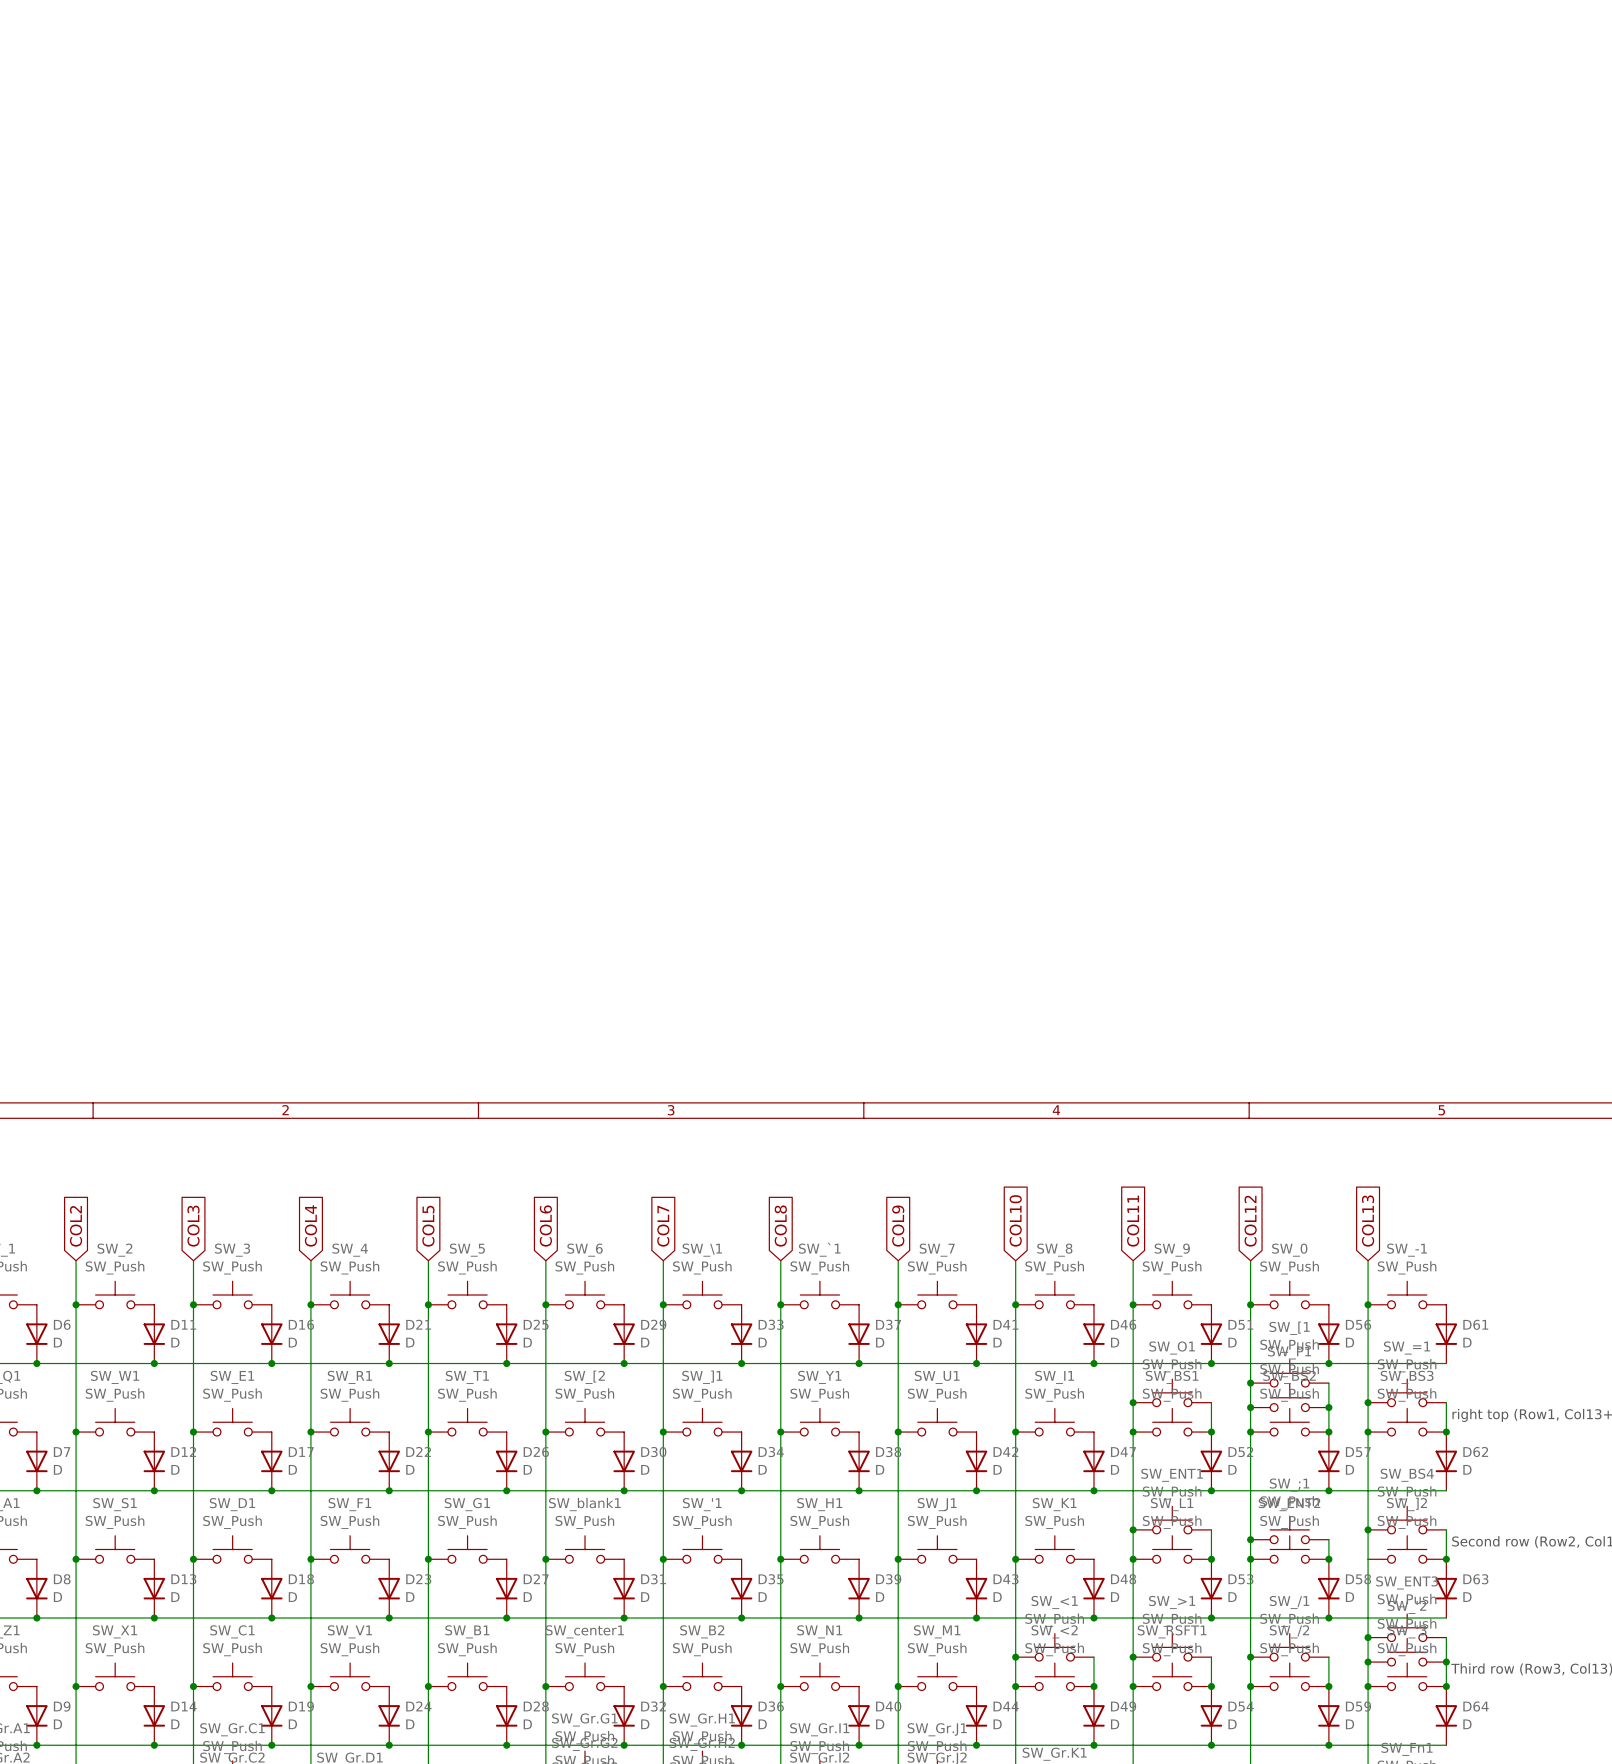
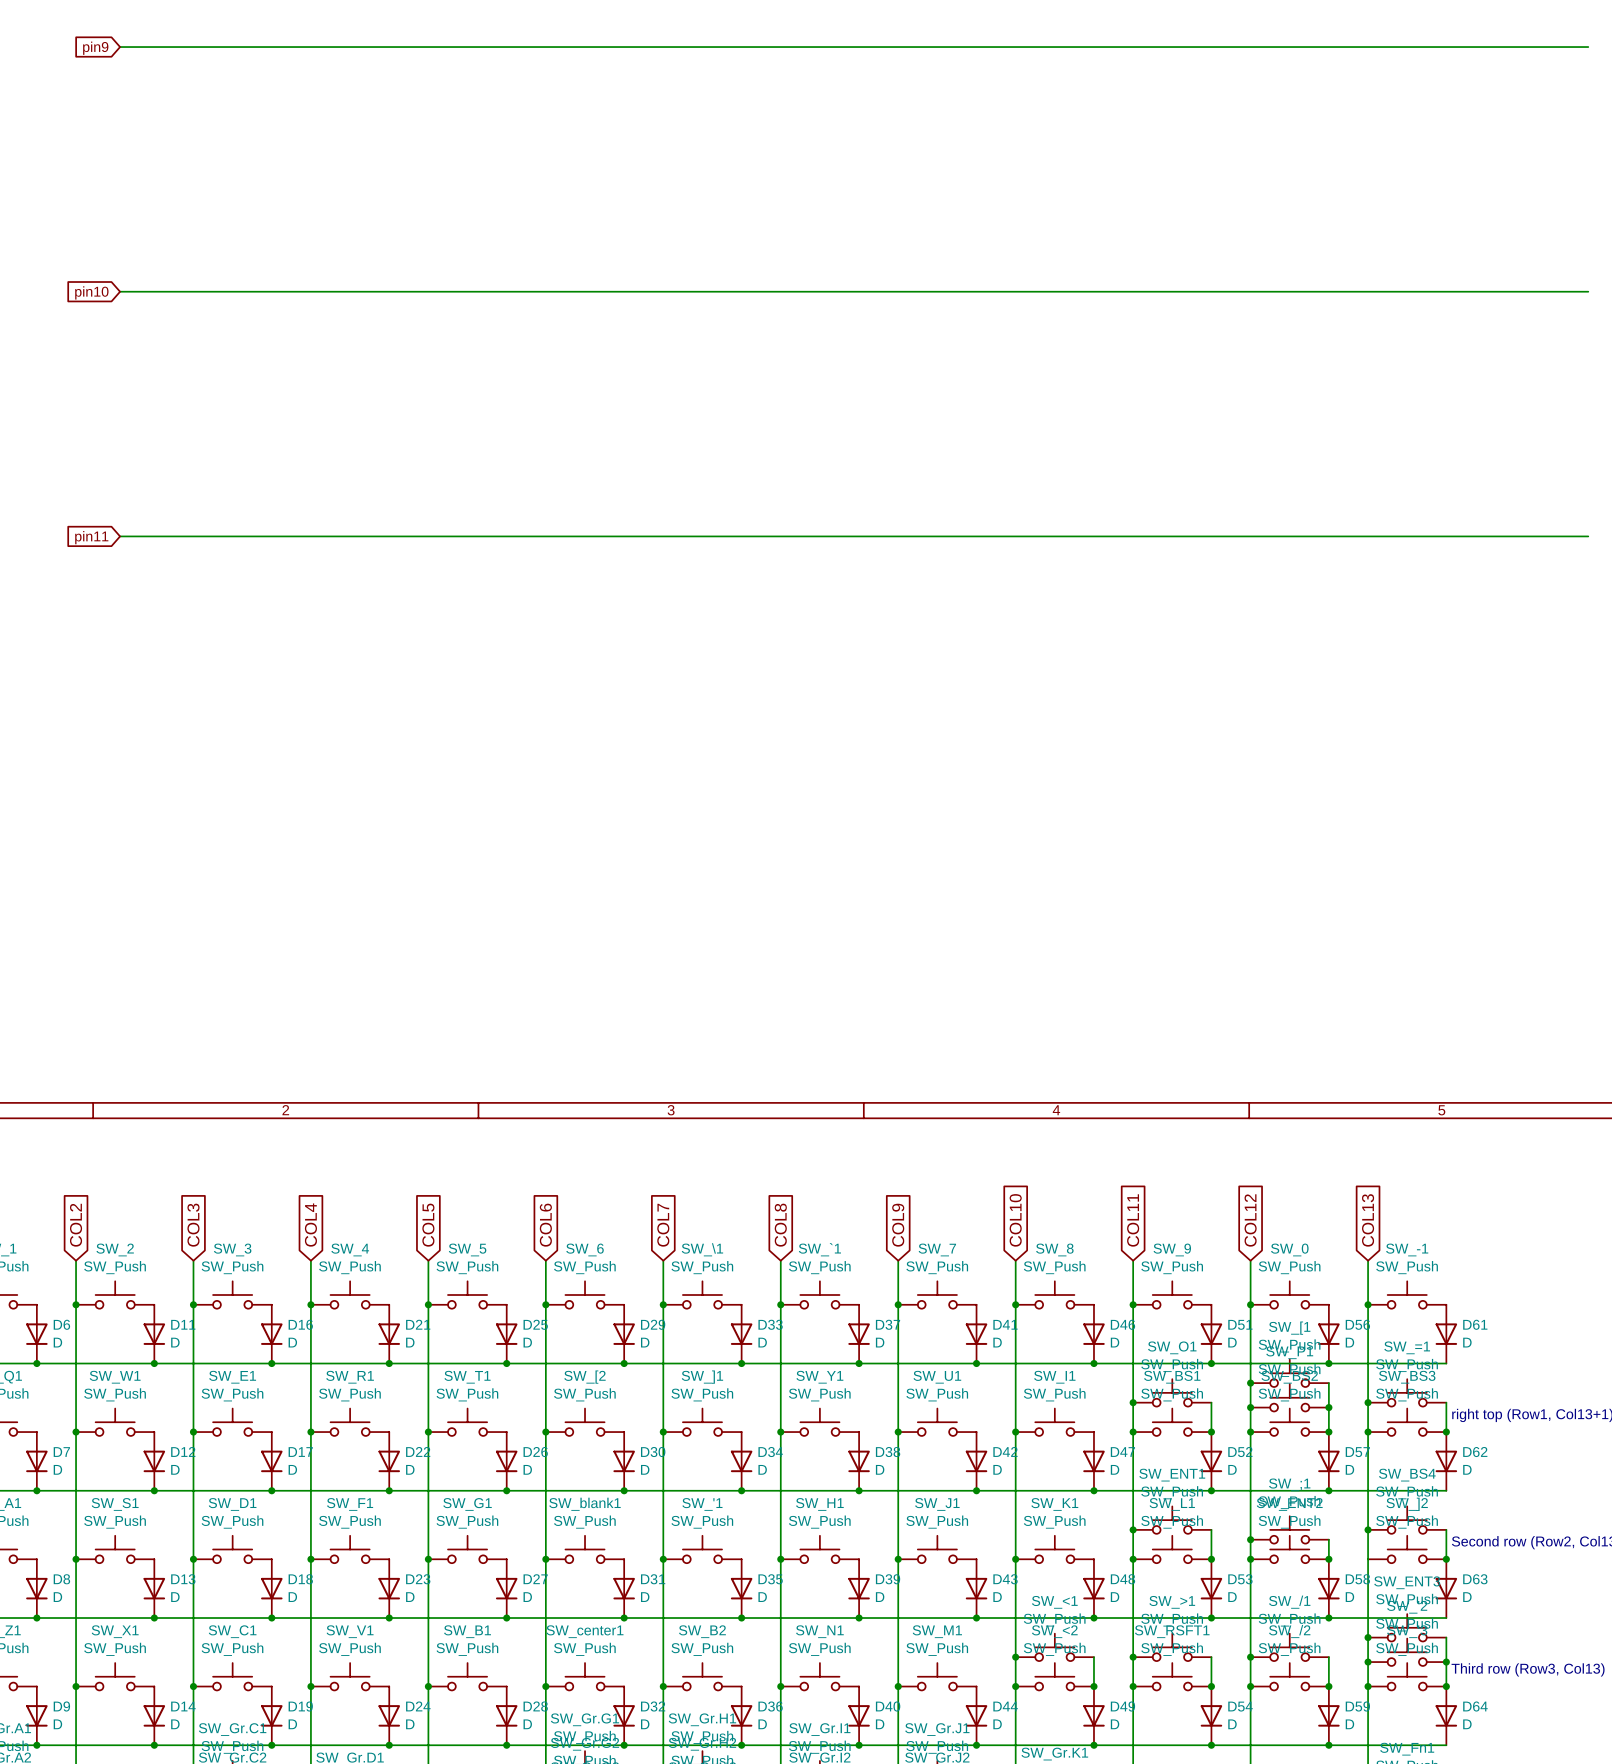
wire: none -> (120, 47) (1588, 47)
global label: none -> pin9 (95, 48)
wire: none -> (120, 291) (1588, 291)
global label: none -> pin10 (91, 292)
wire: none -> (120, 536) (1588, 536)
global label: none -> pin11 (91, 537)

